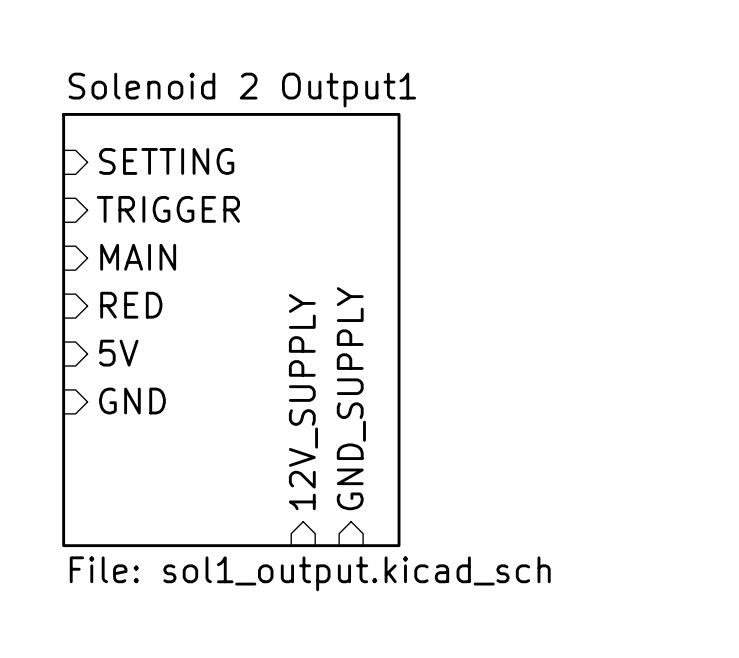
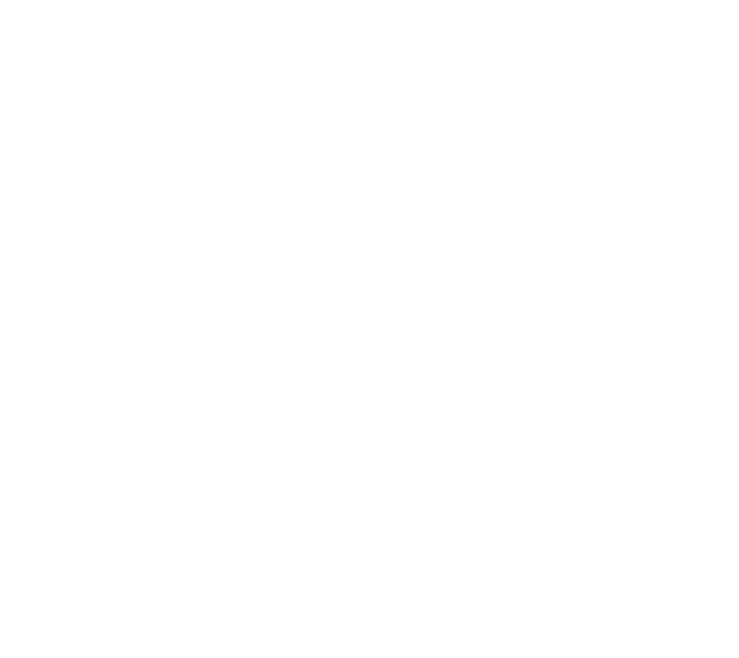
sheet pin: SETTING (166, 161) -> none
sheet pin: TRIGGER (168, 209) -> none
sheet pin: MAIN (138, 257) -> none
sheet pin: RED (131, 305) -> none
sheet Solenoid 2 Output1: File: sol1_output.kicad_sch (231, 330) -> none
sheet pin: 5V (118, 353) -> none
sheet pin: GND_SUPPLY (351, 398) -> none
sheet pin: GND (132, 401) -> none
sheet pin: 12V_SUPPLY (303, 402) -> none

